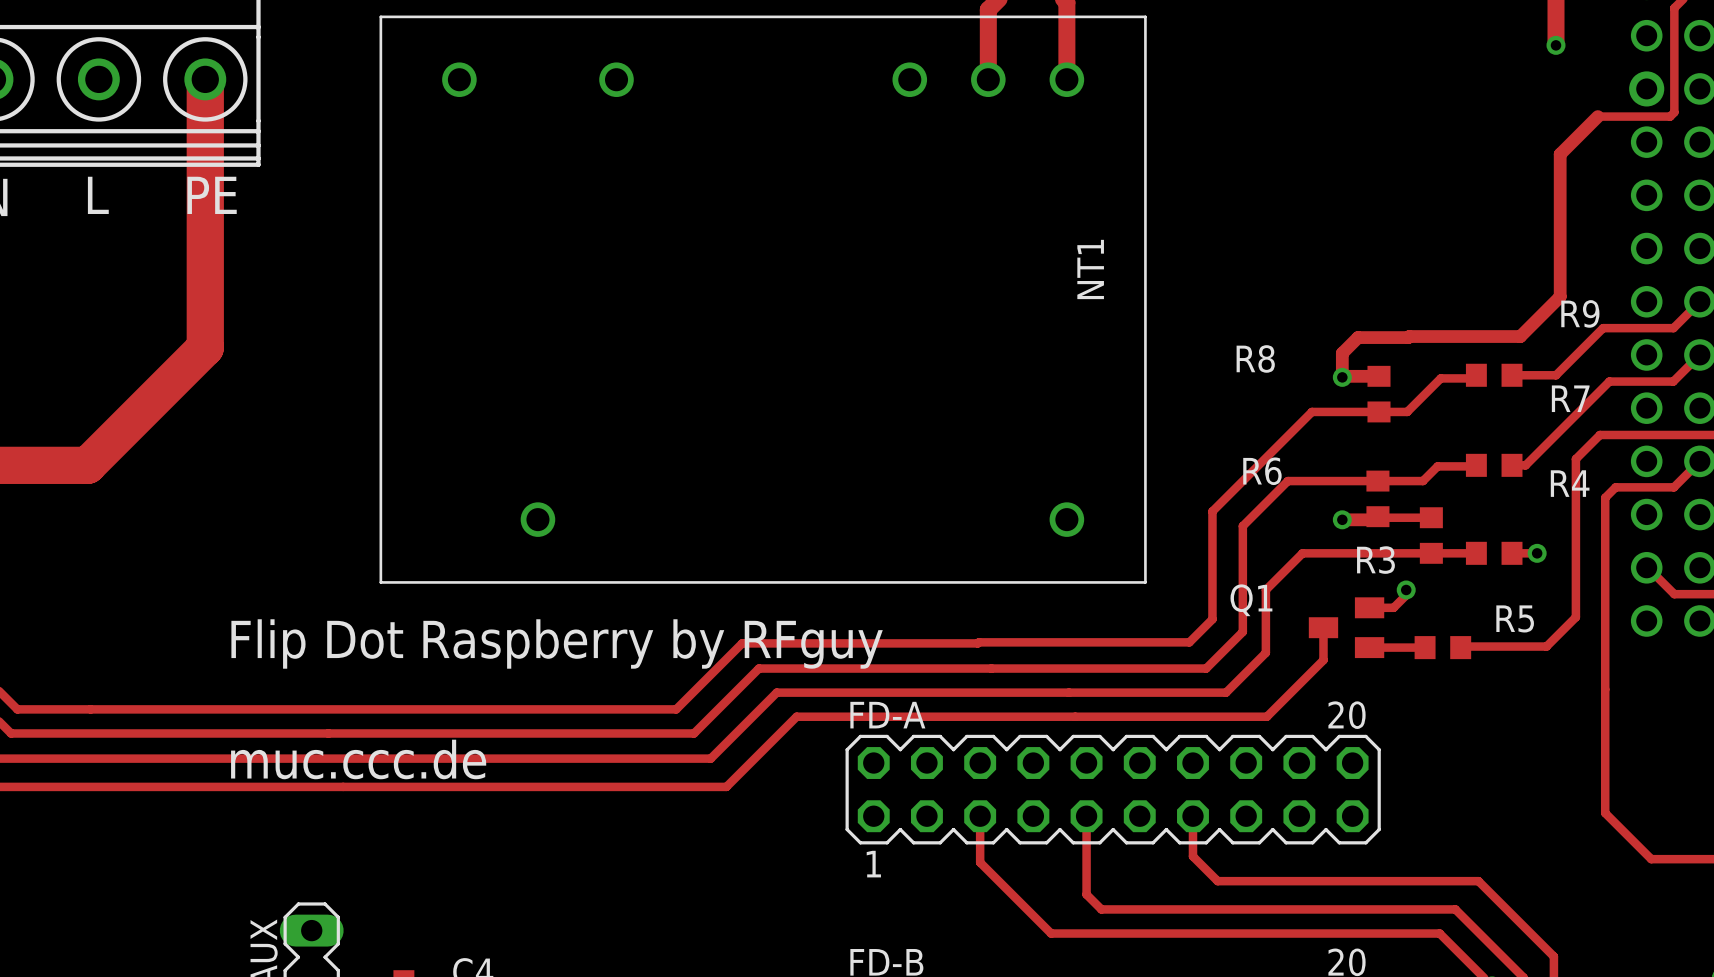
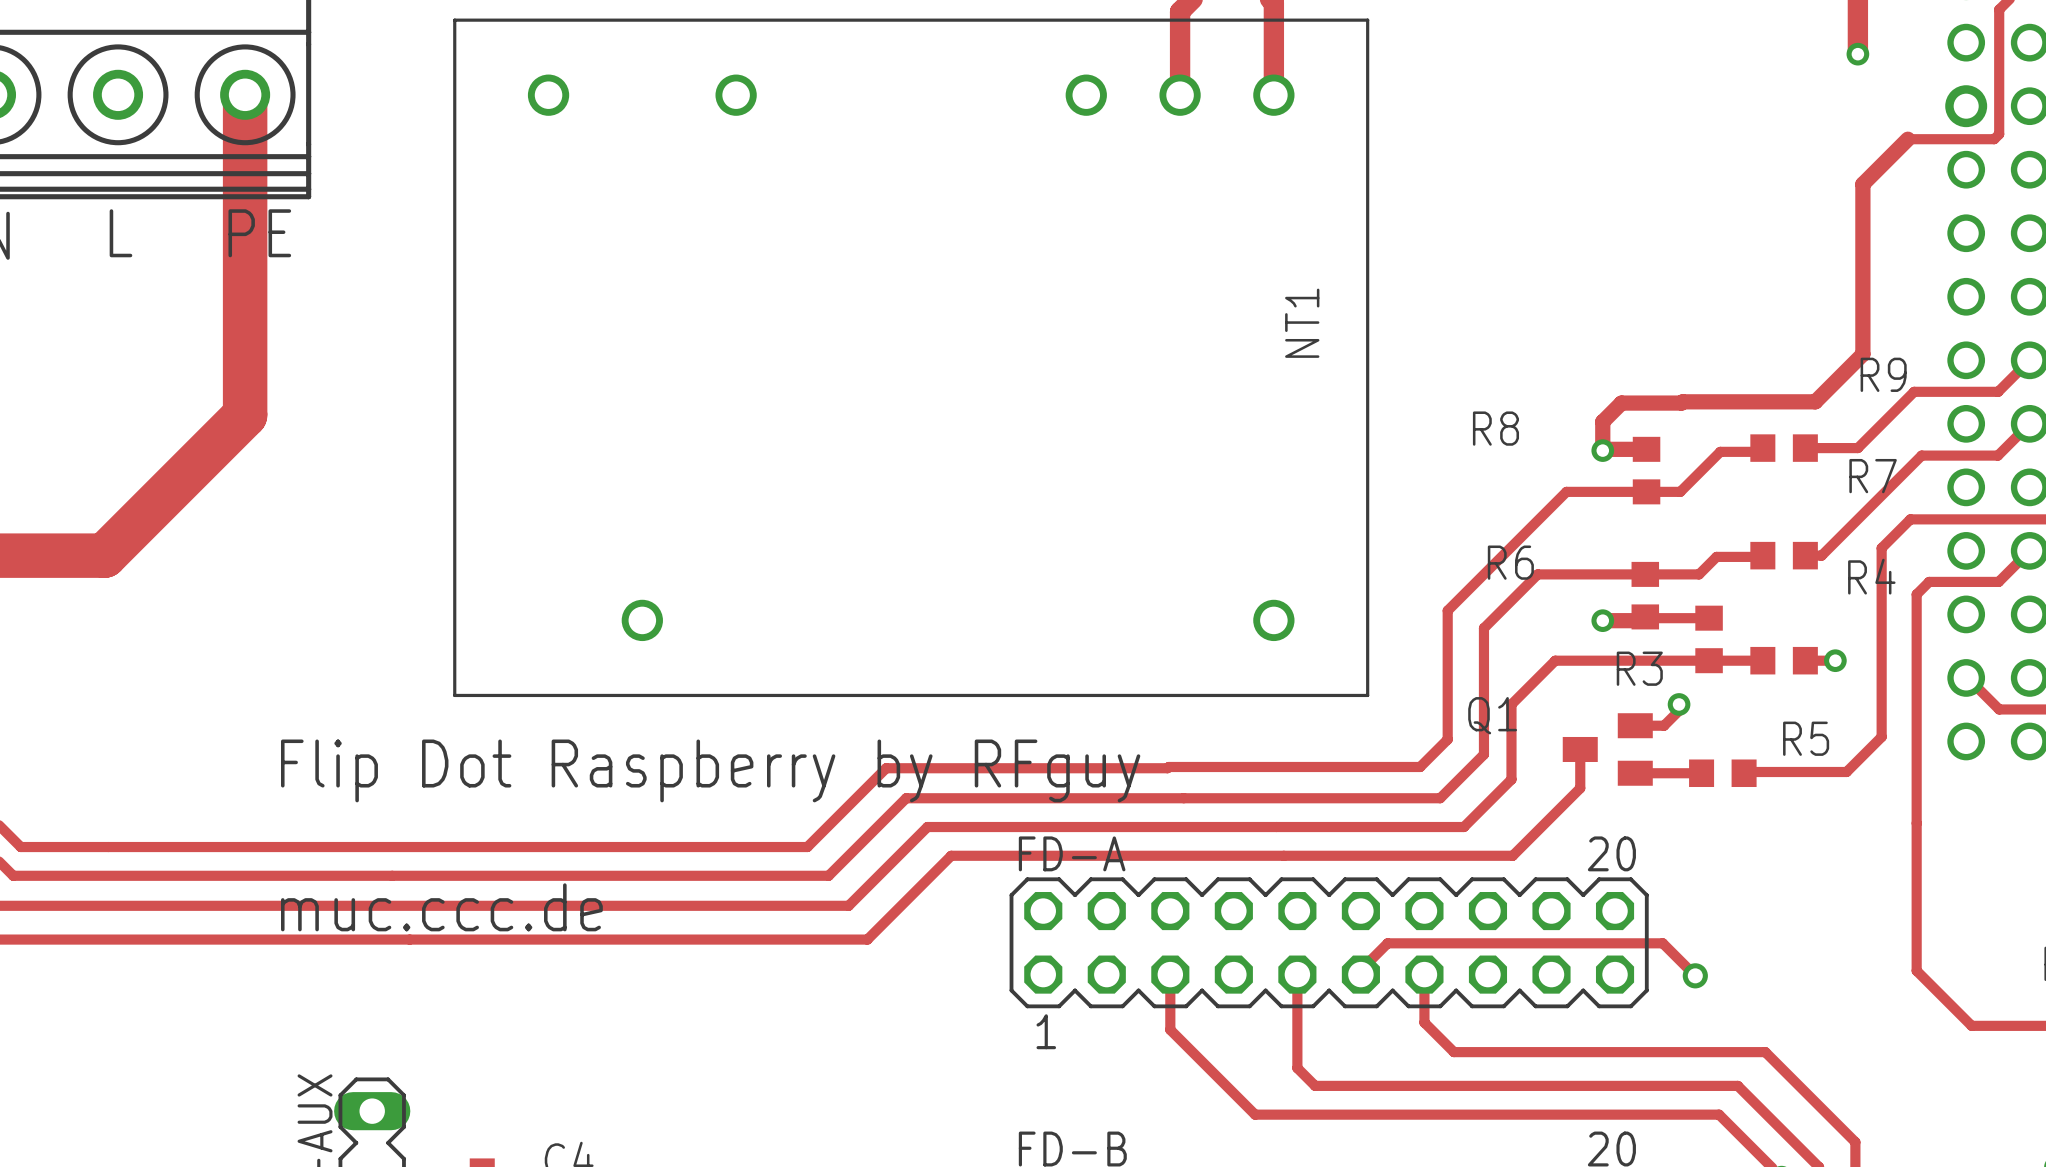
track: none -> (1360, 974) (1360, 970) (1387, 943) (1662, 943) (1695, 975)
via: none -> (1695, 975)

